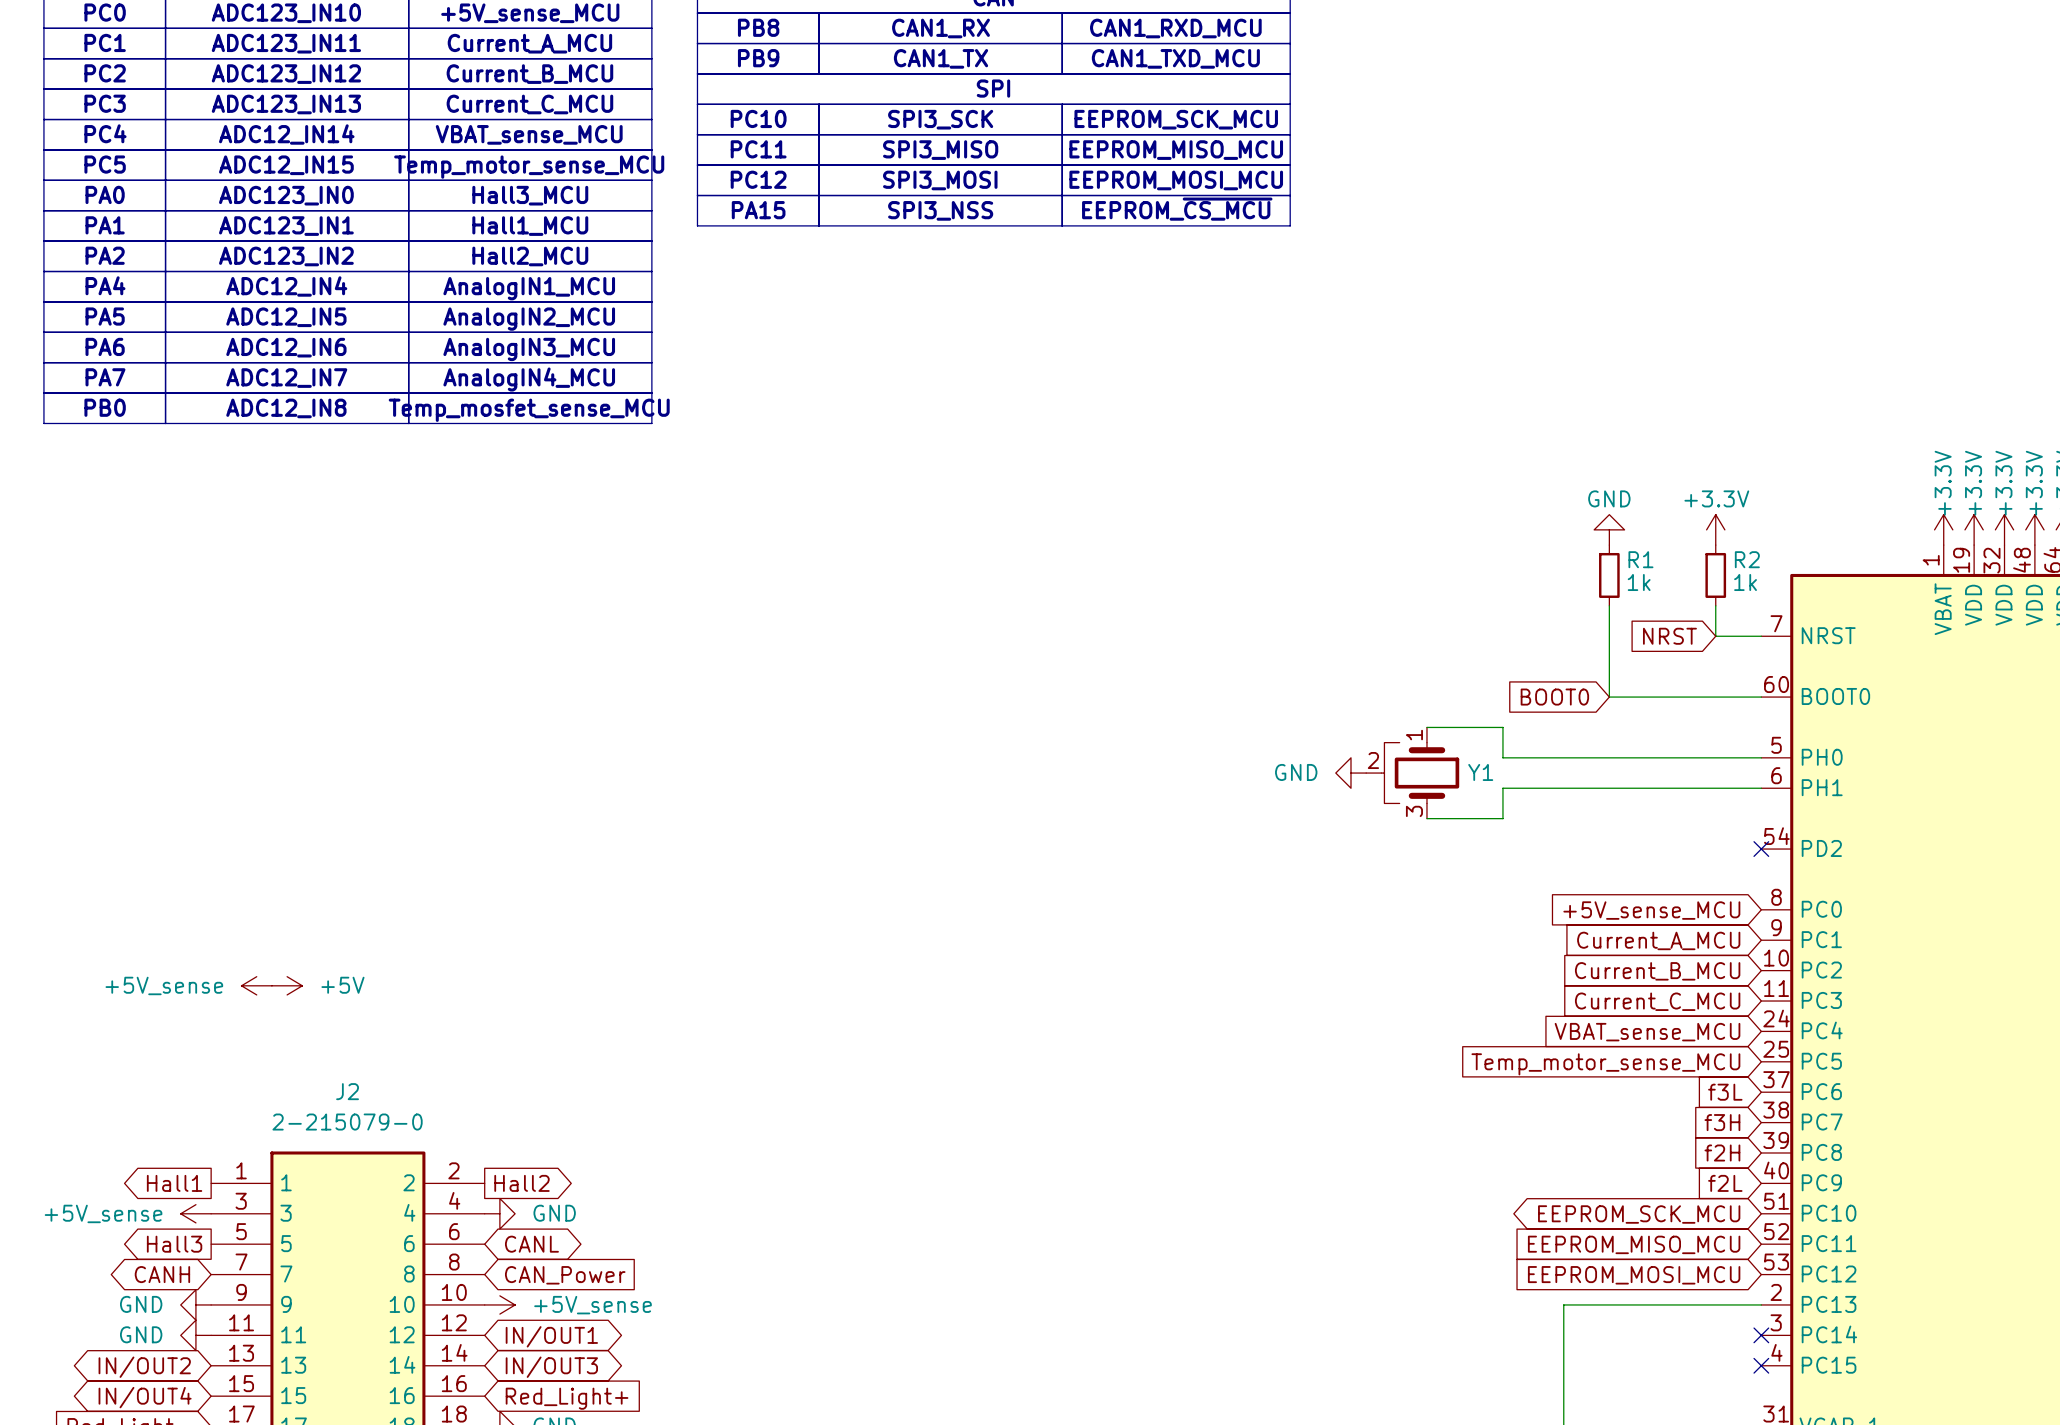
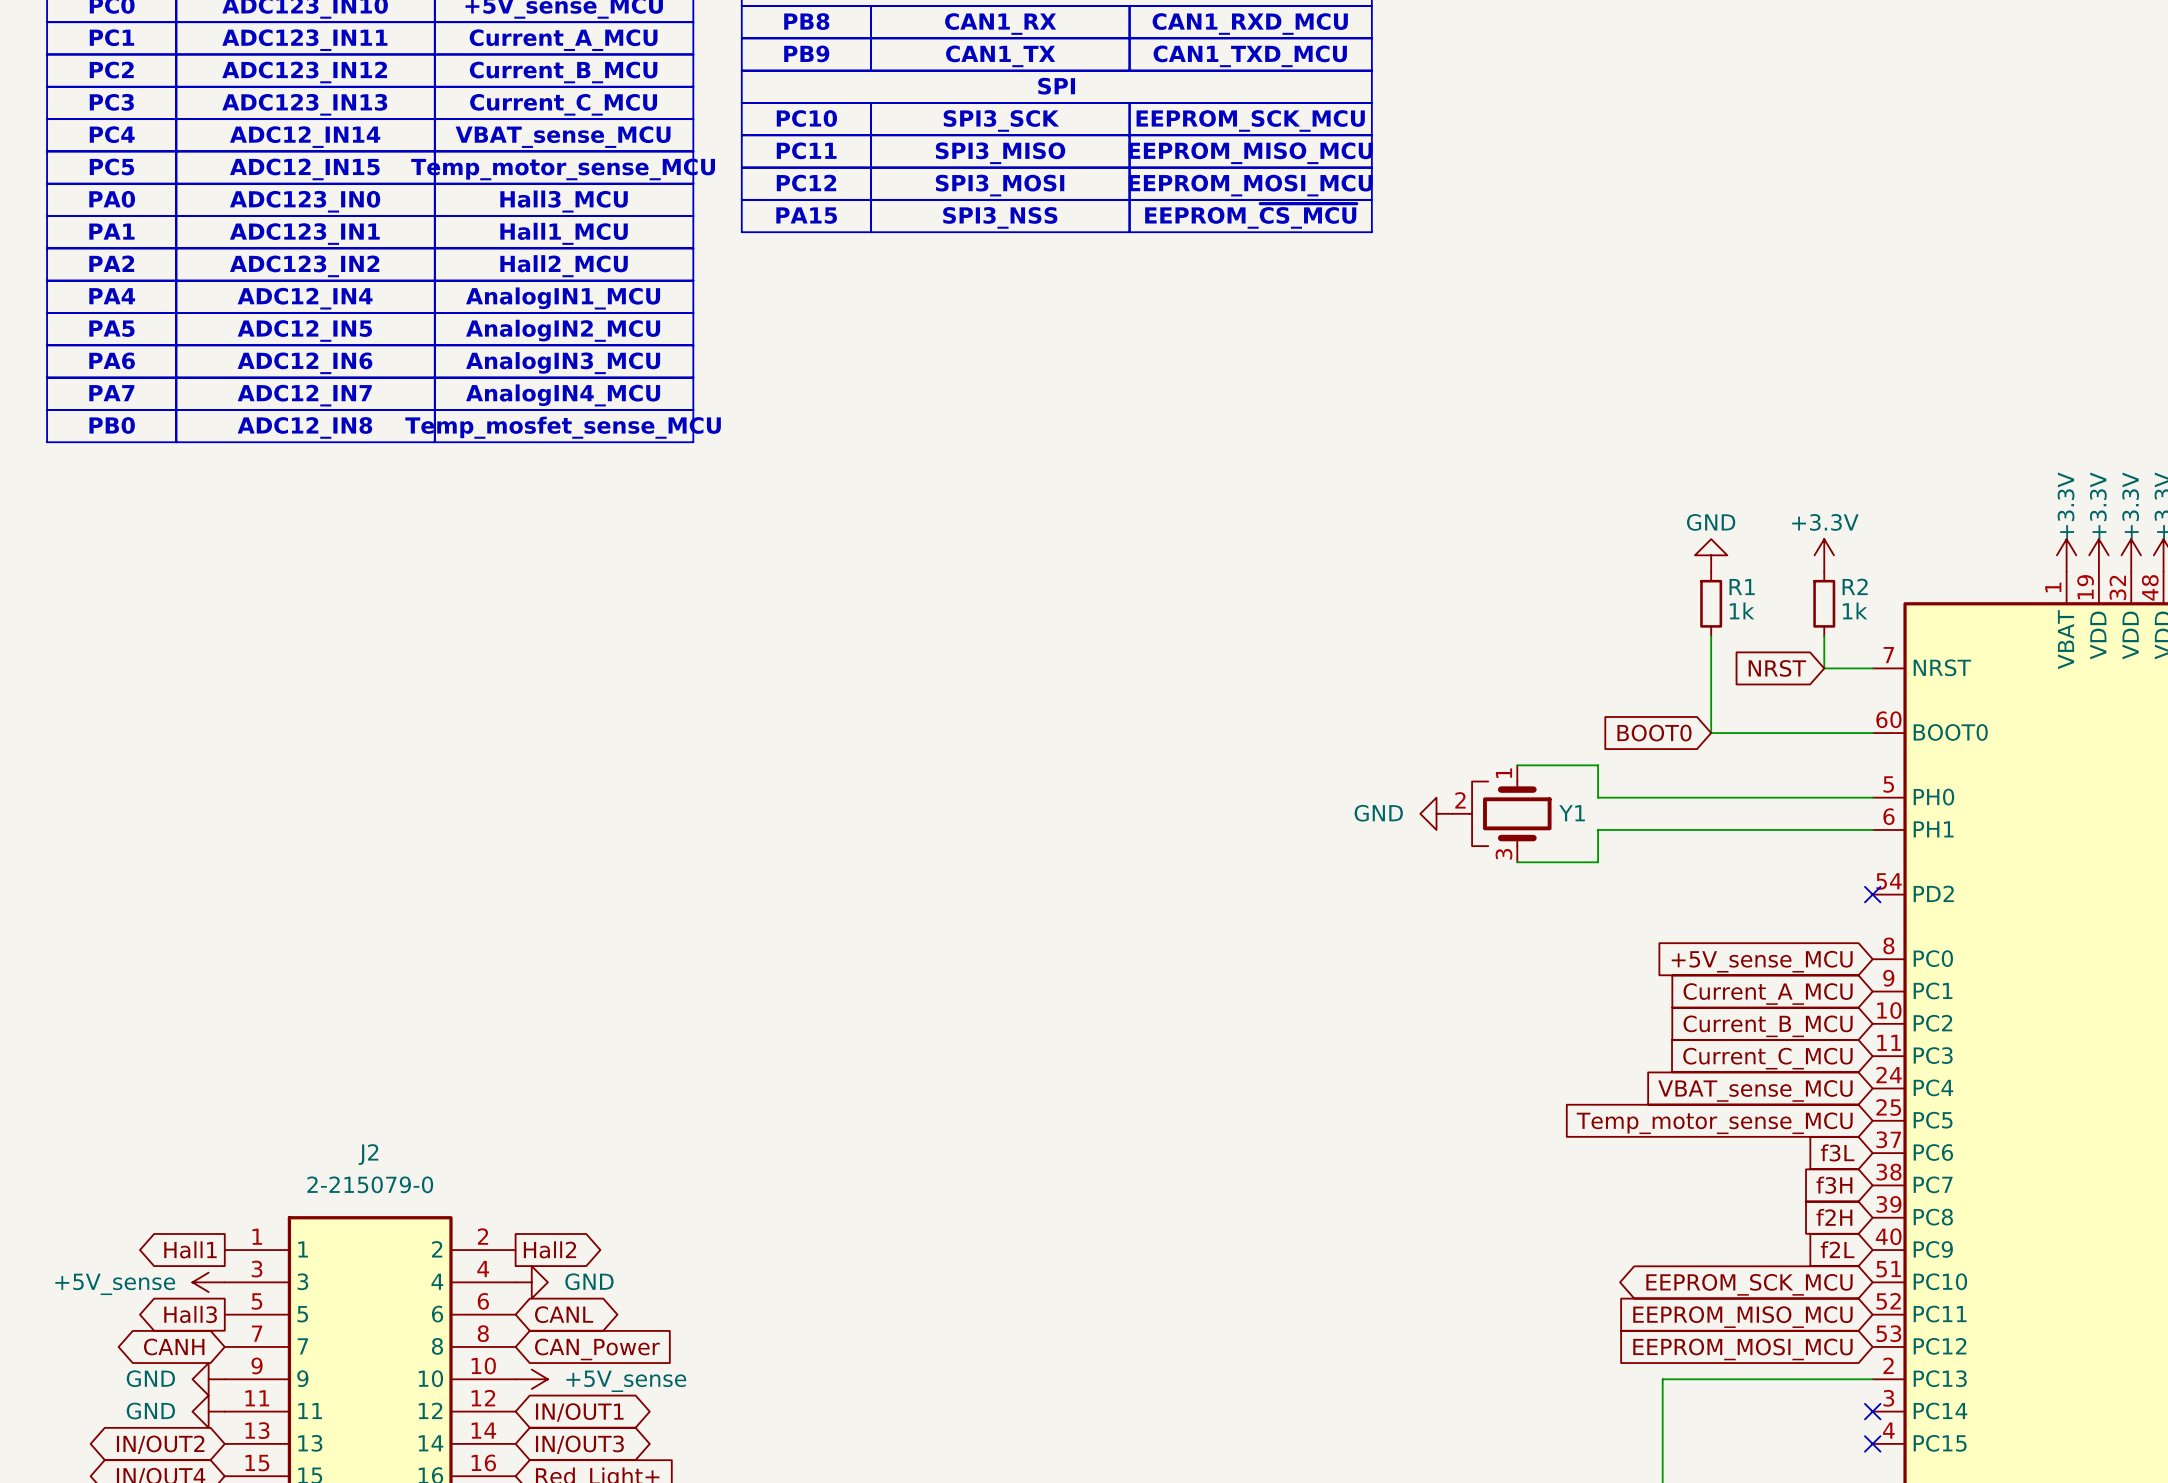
power symbol: +5V_sense (256, 985) -> none
power symbol: +5V (287, 985) -> none

